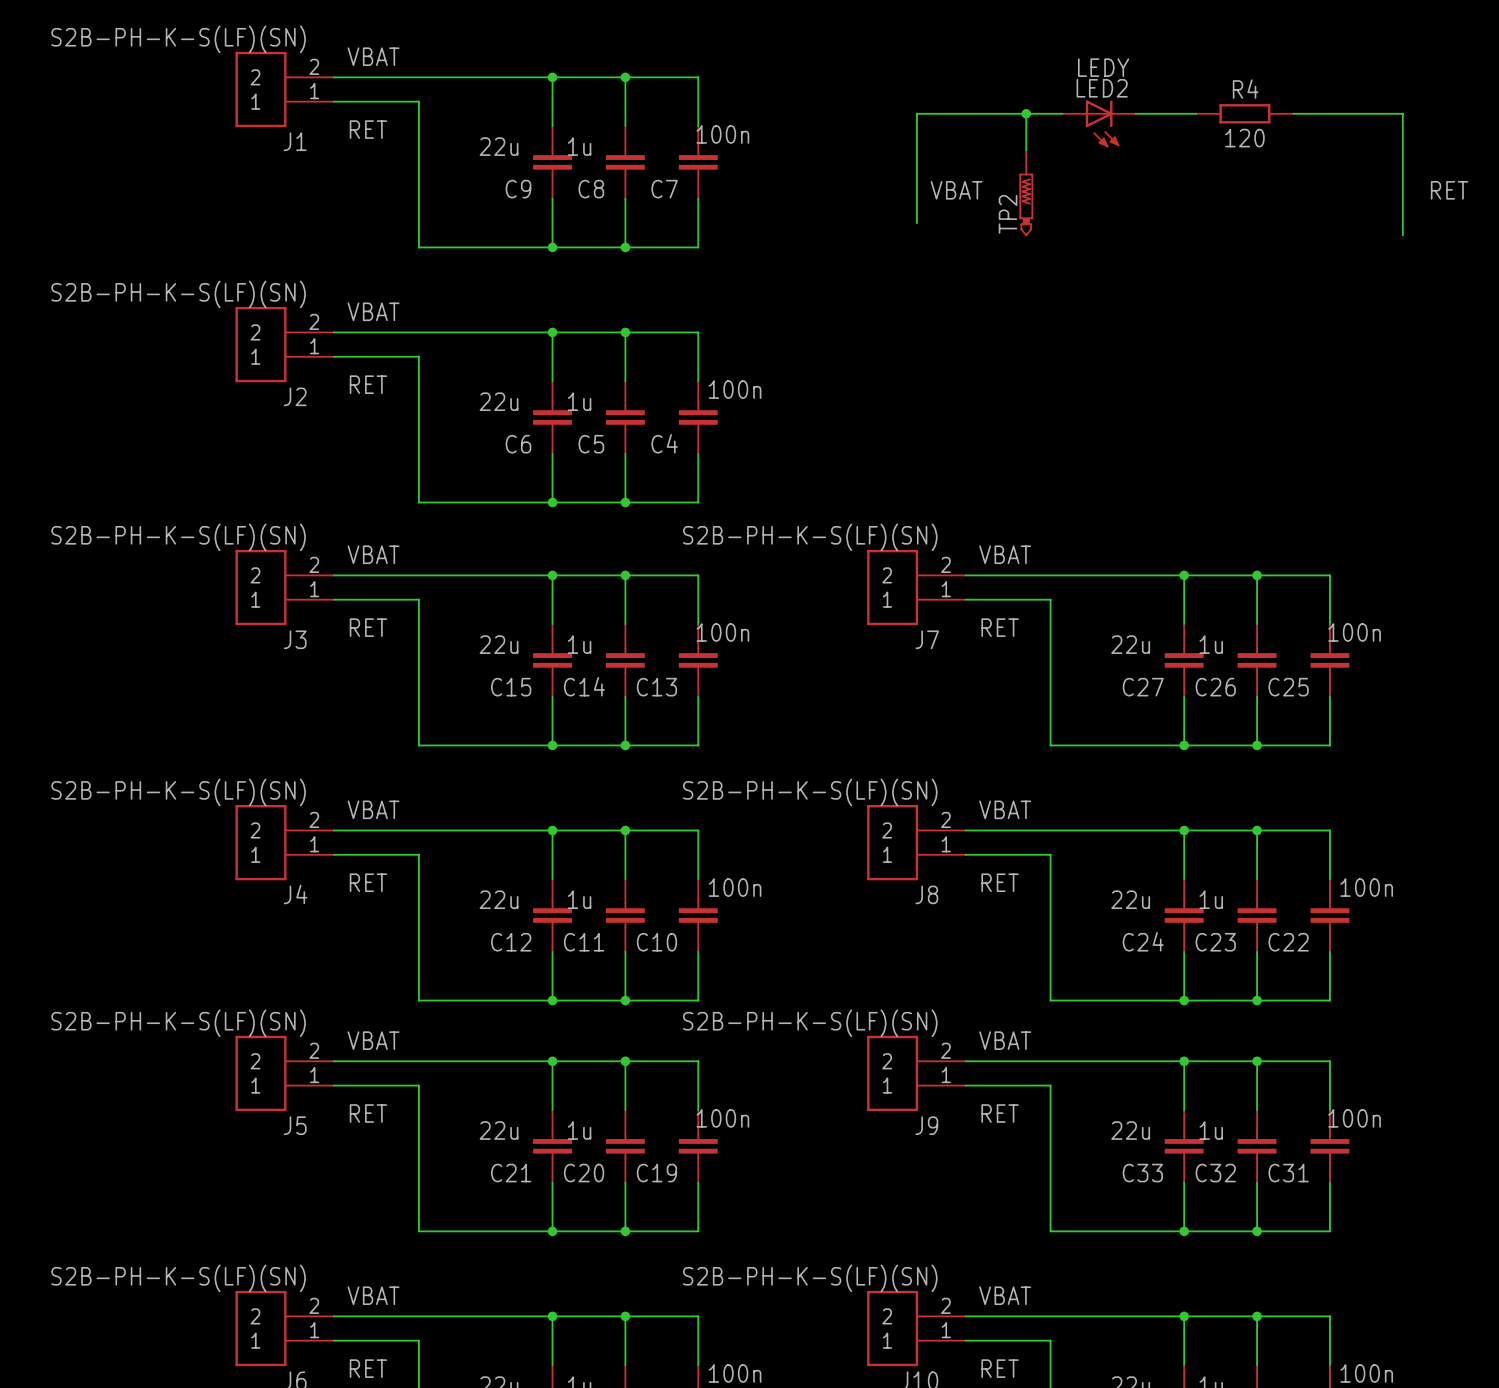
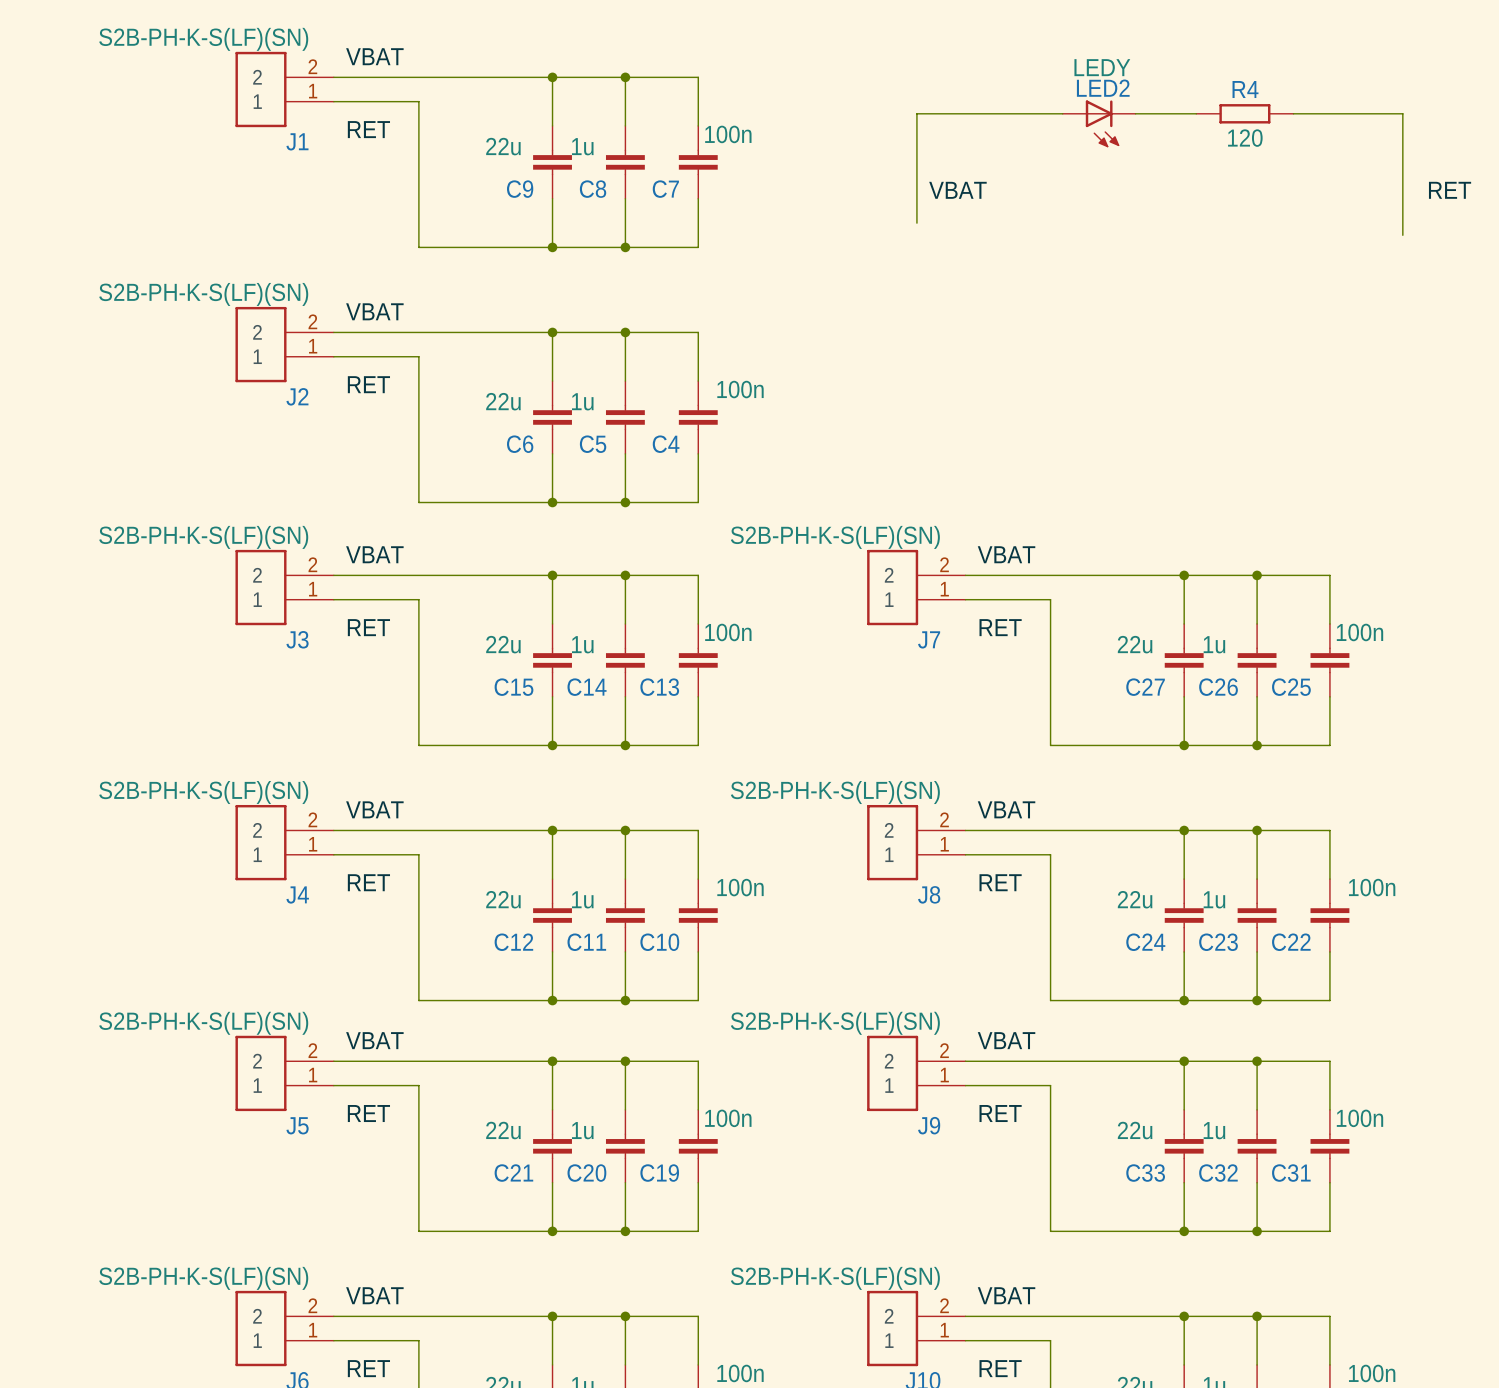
wire: (1026, 113) (1026, 150) -> none
junction: (1026, 113) -> none
TP2: (1026, 193) -> none

